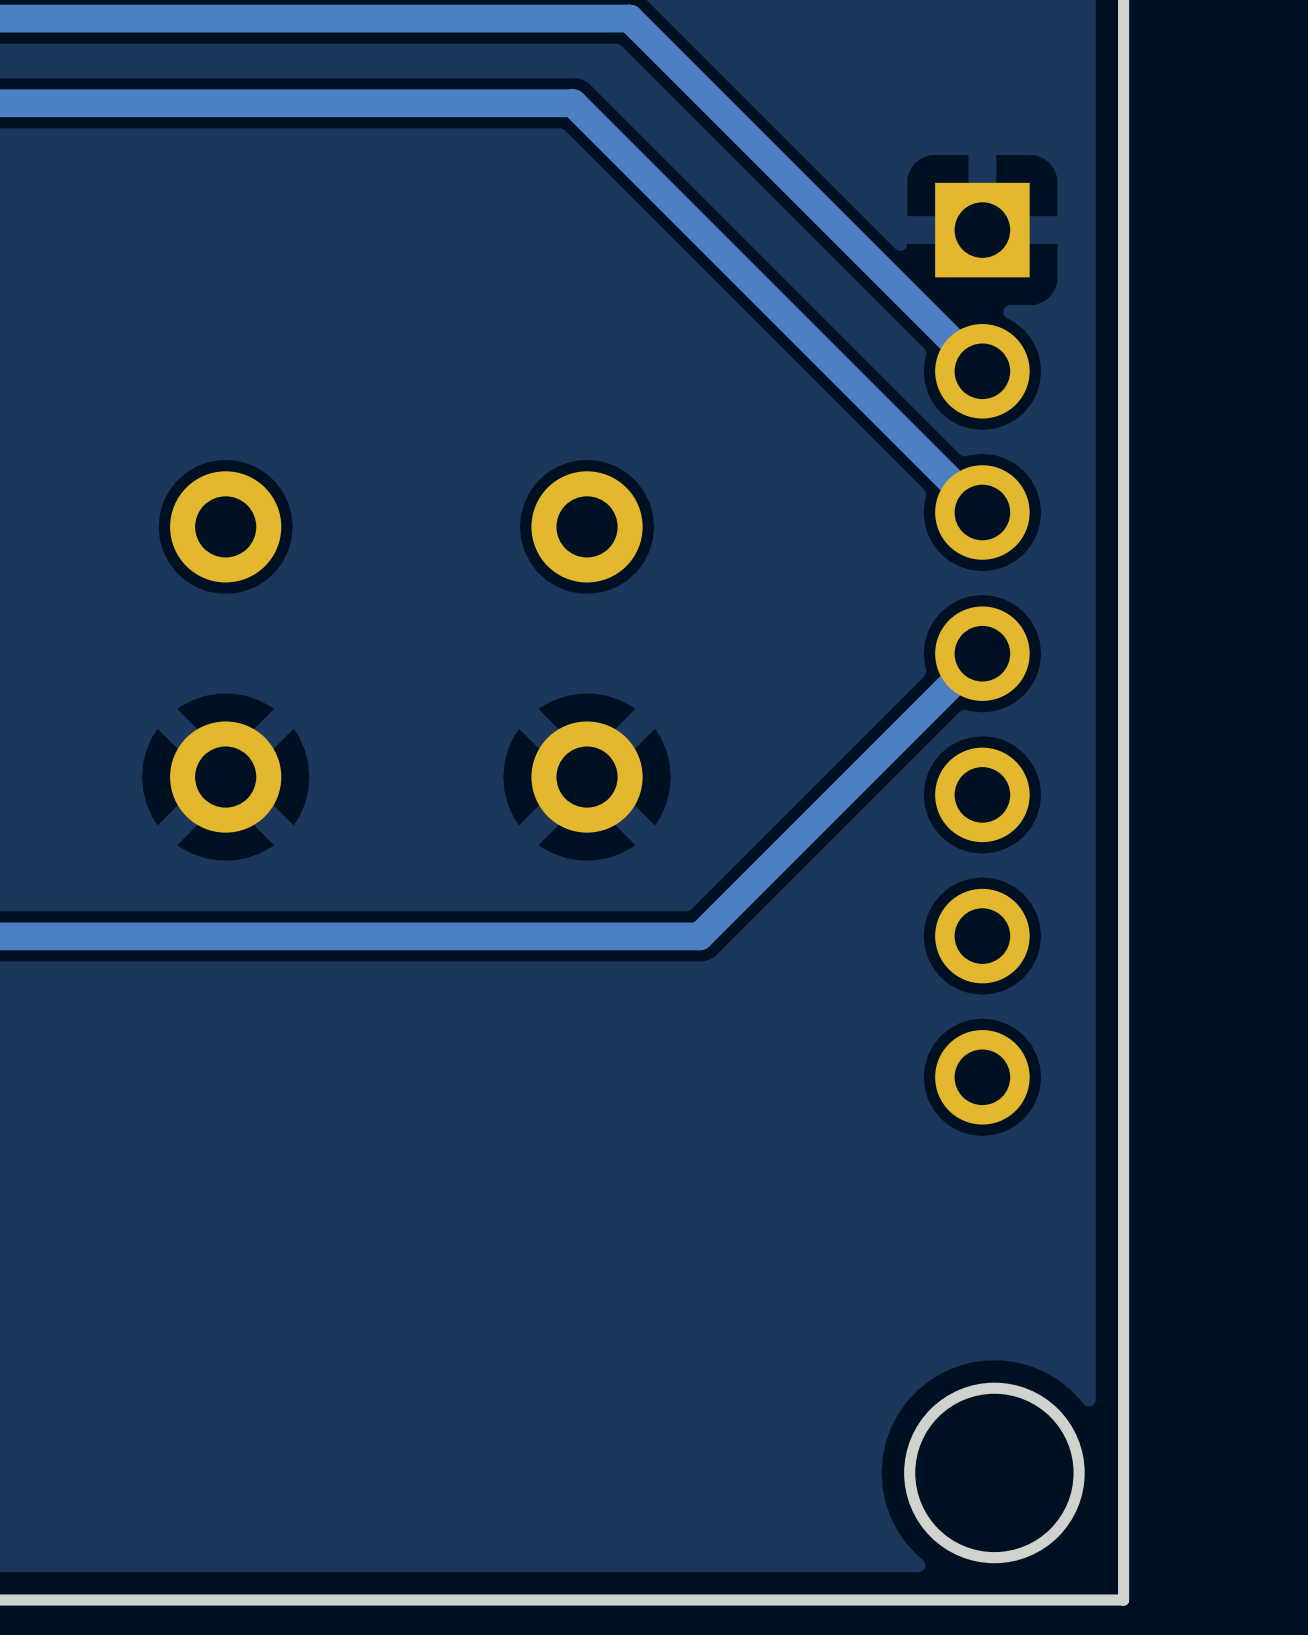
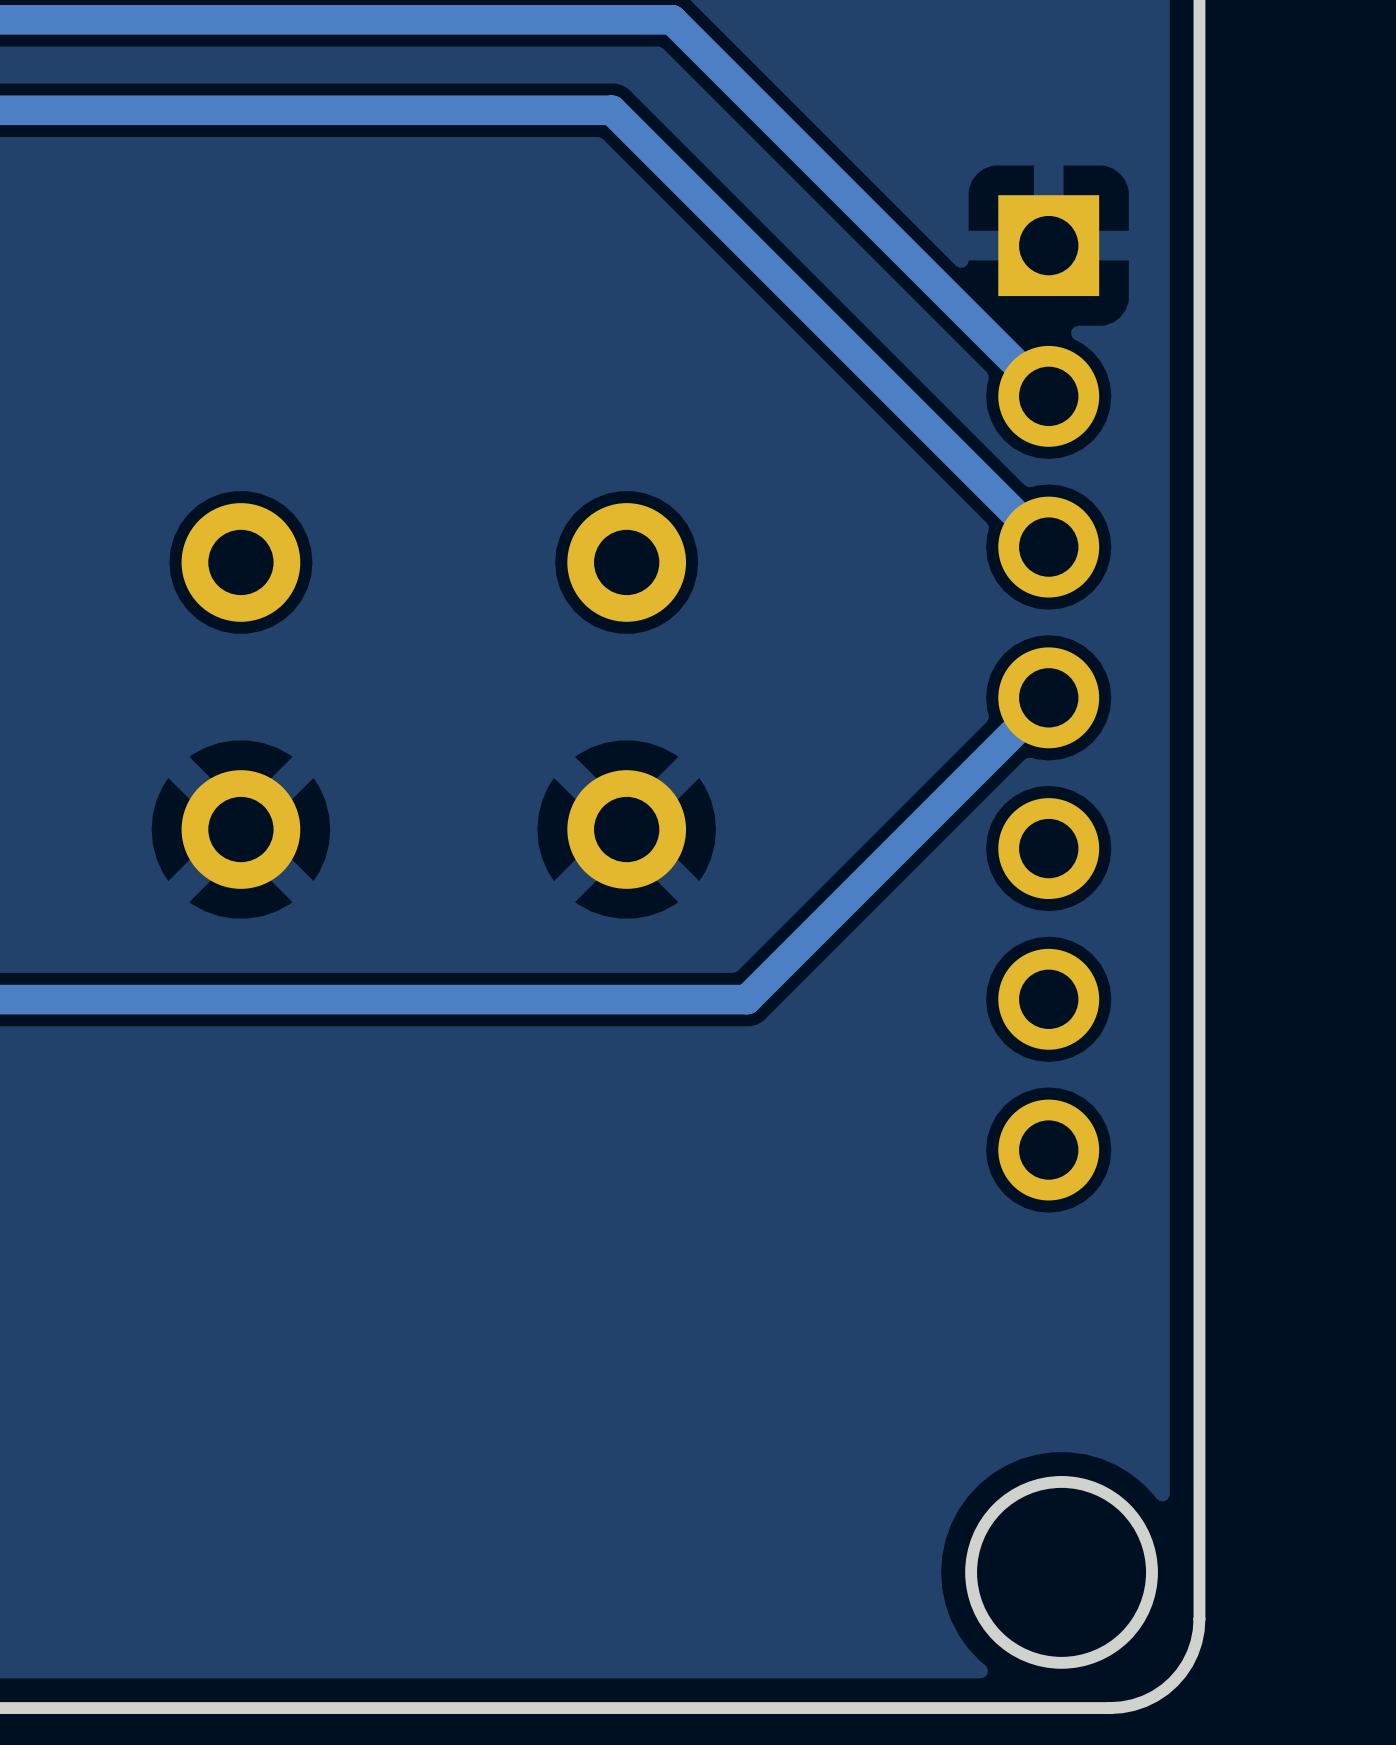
board edge: (1123, 1516) (1123, 1600) (1040, 1600) -> (1199, 1619) (1196, 1642) (1192, 1653) (1181, 1673) (1173, 1681) (1154, 1696) (1144, 1701) (1133, 1705) (1110, 1708)

